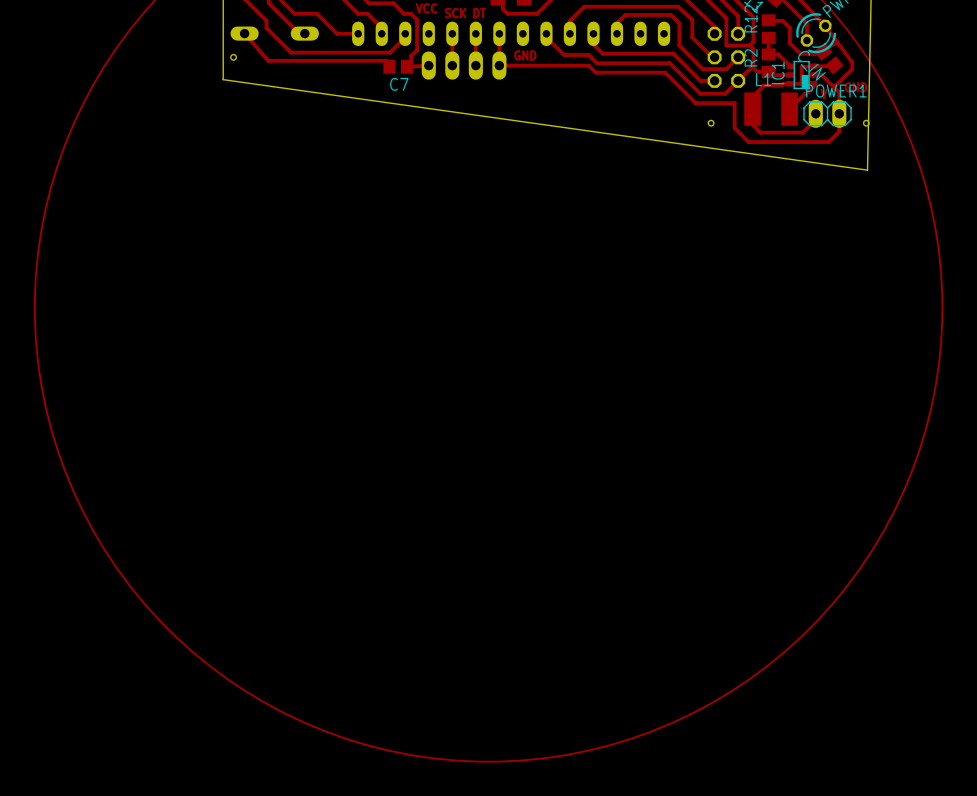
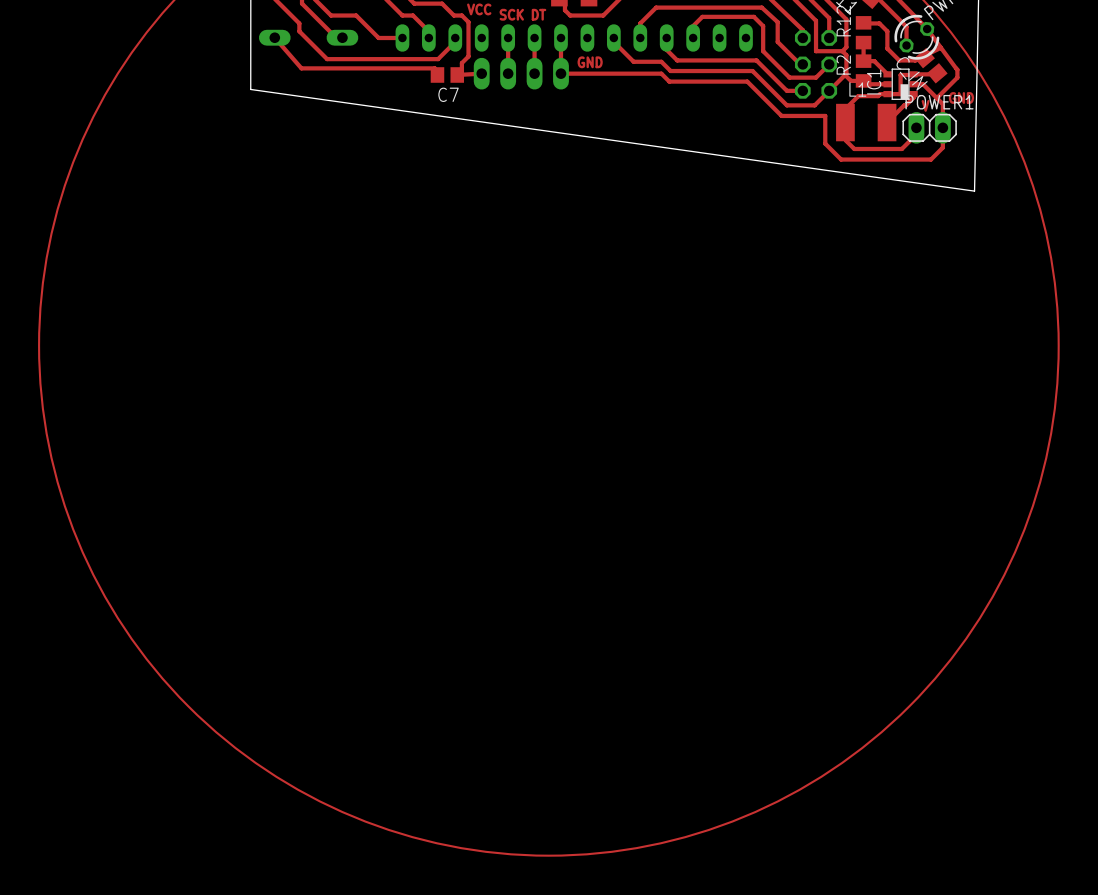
hole: (233, 57) -> none
hole: (711, 123) -> none
hole: (866, 123) -> none

